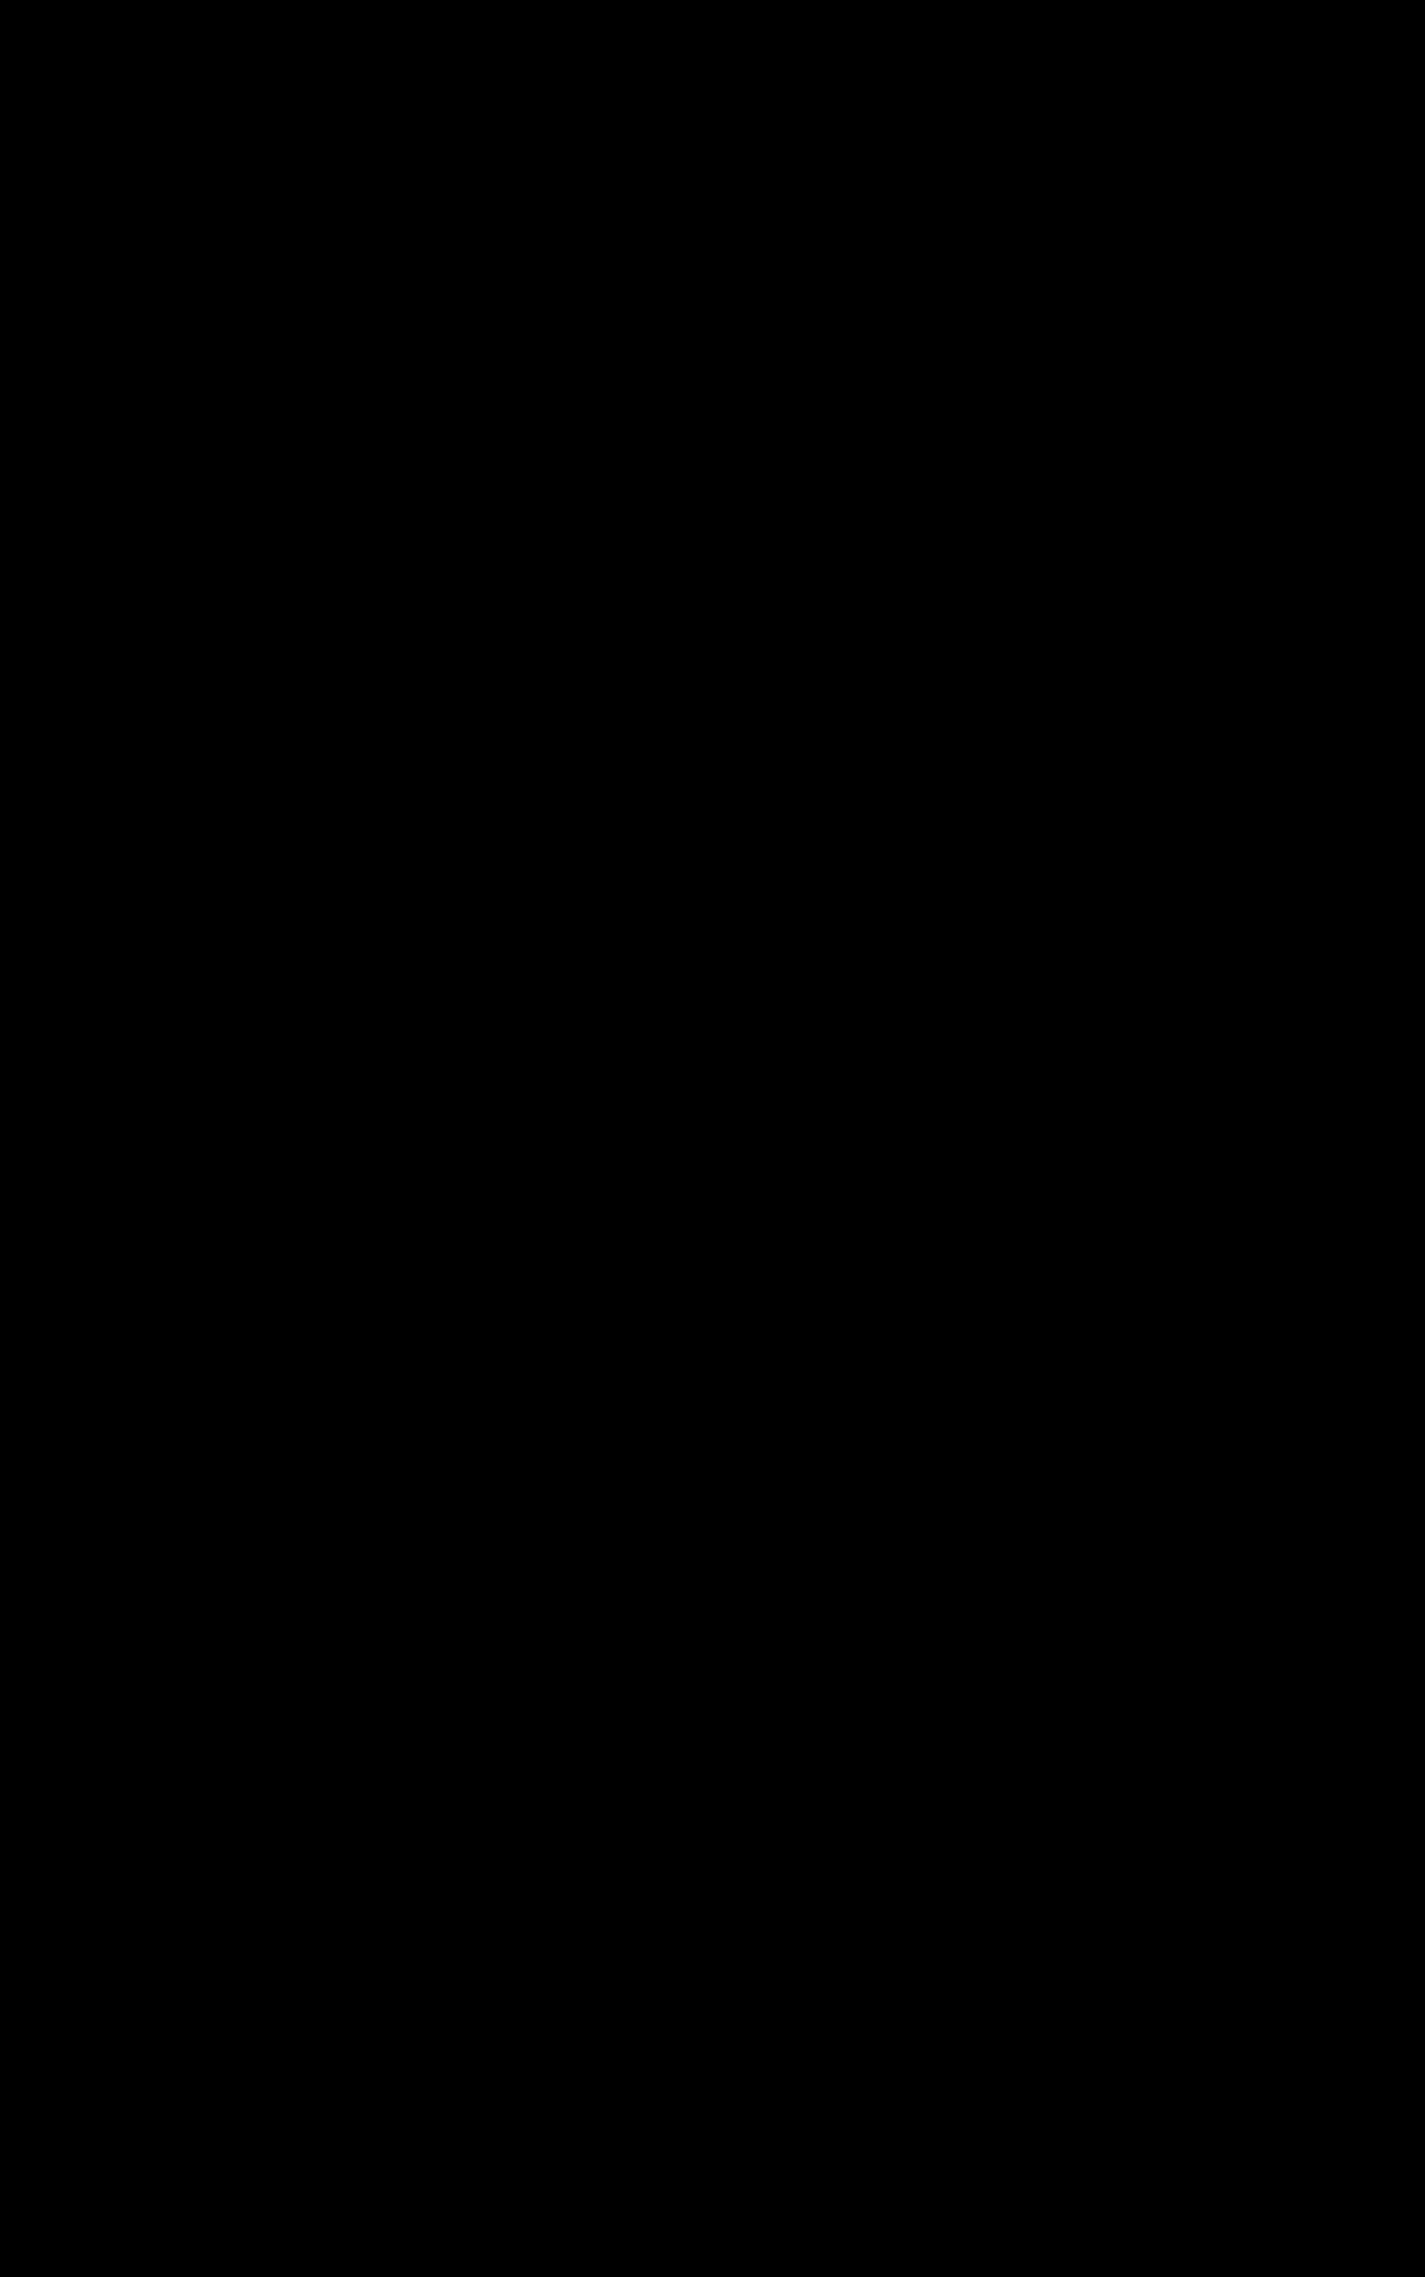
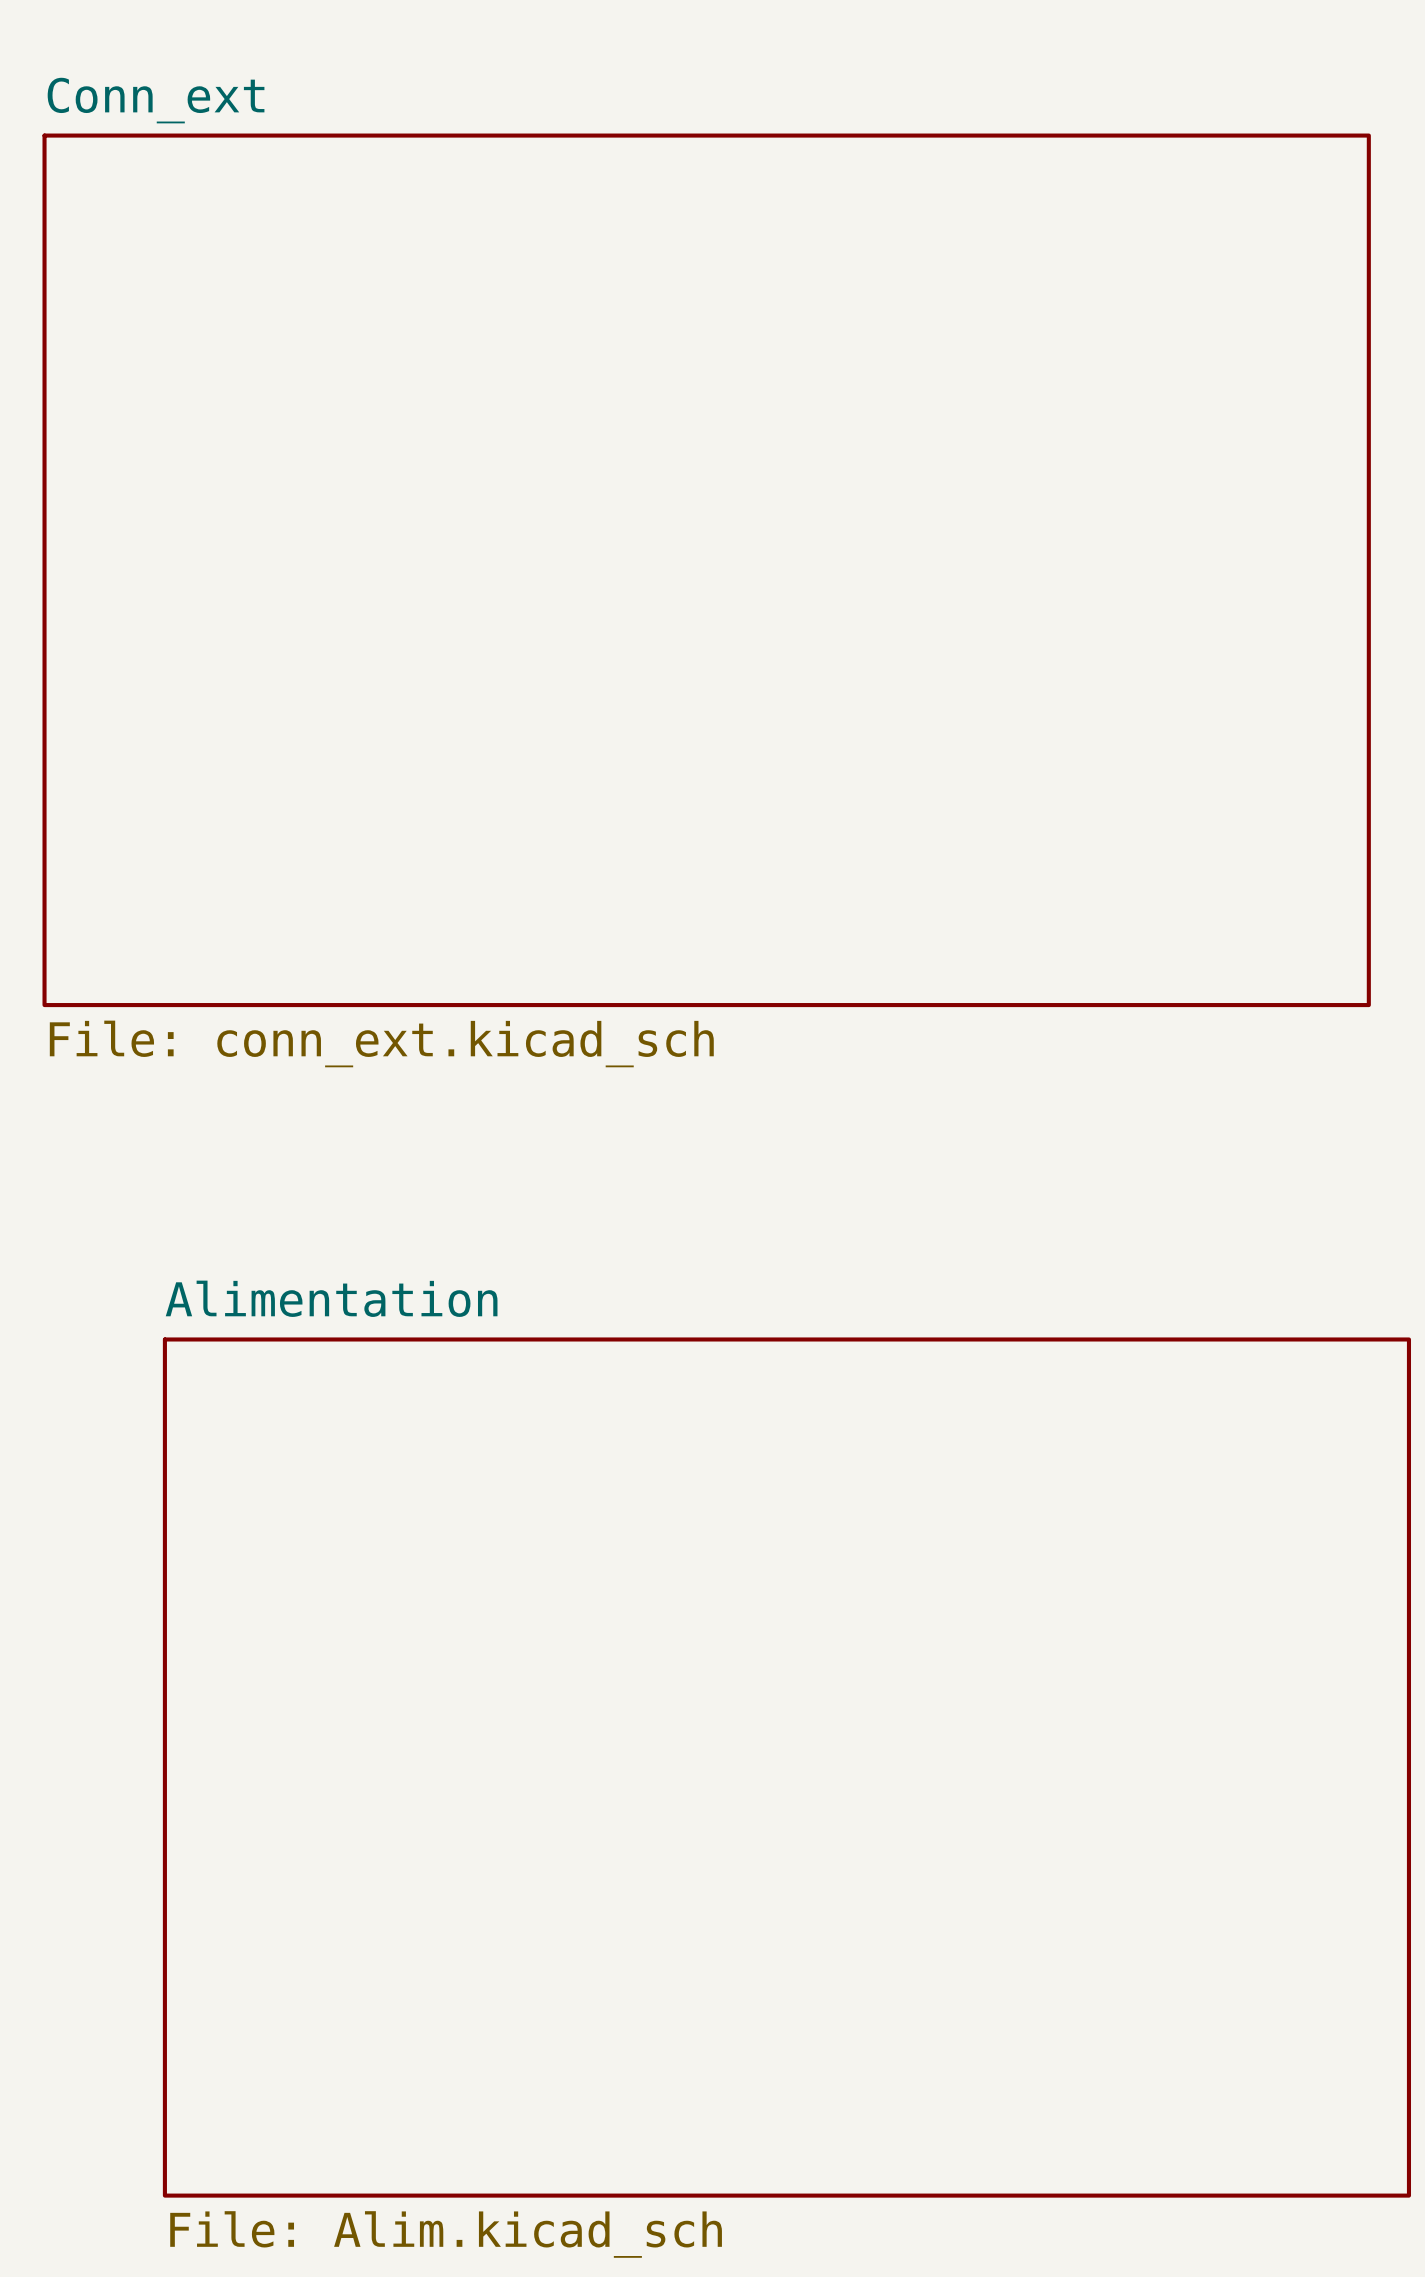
sheet Conn_ext: none -> File: conn_ext.kicad_sch (706, 570)
sheet Alimentation: none -> File: Alim.kicad_sch (786, 1767)

